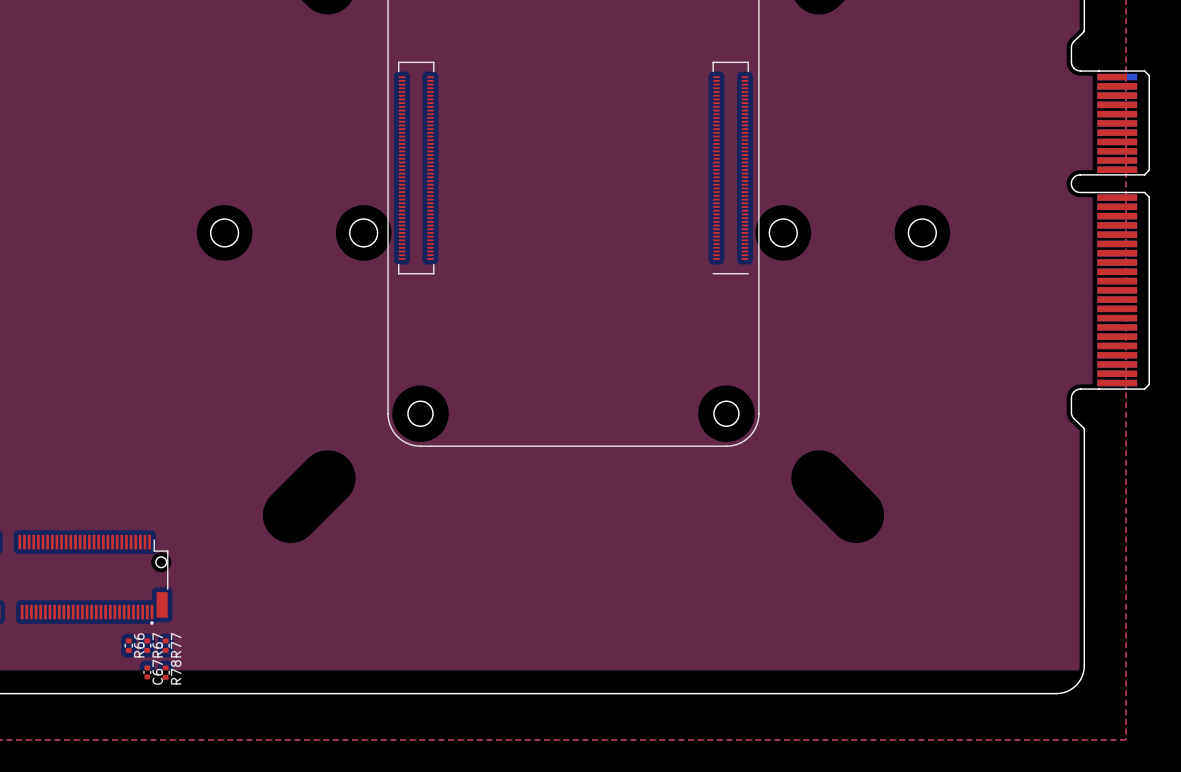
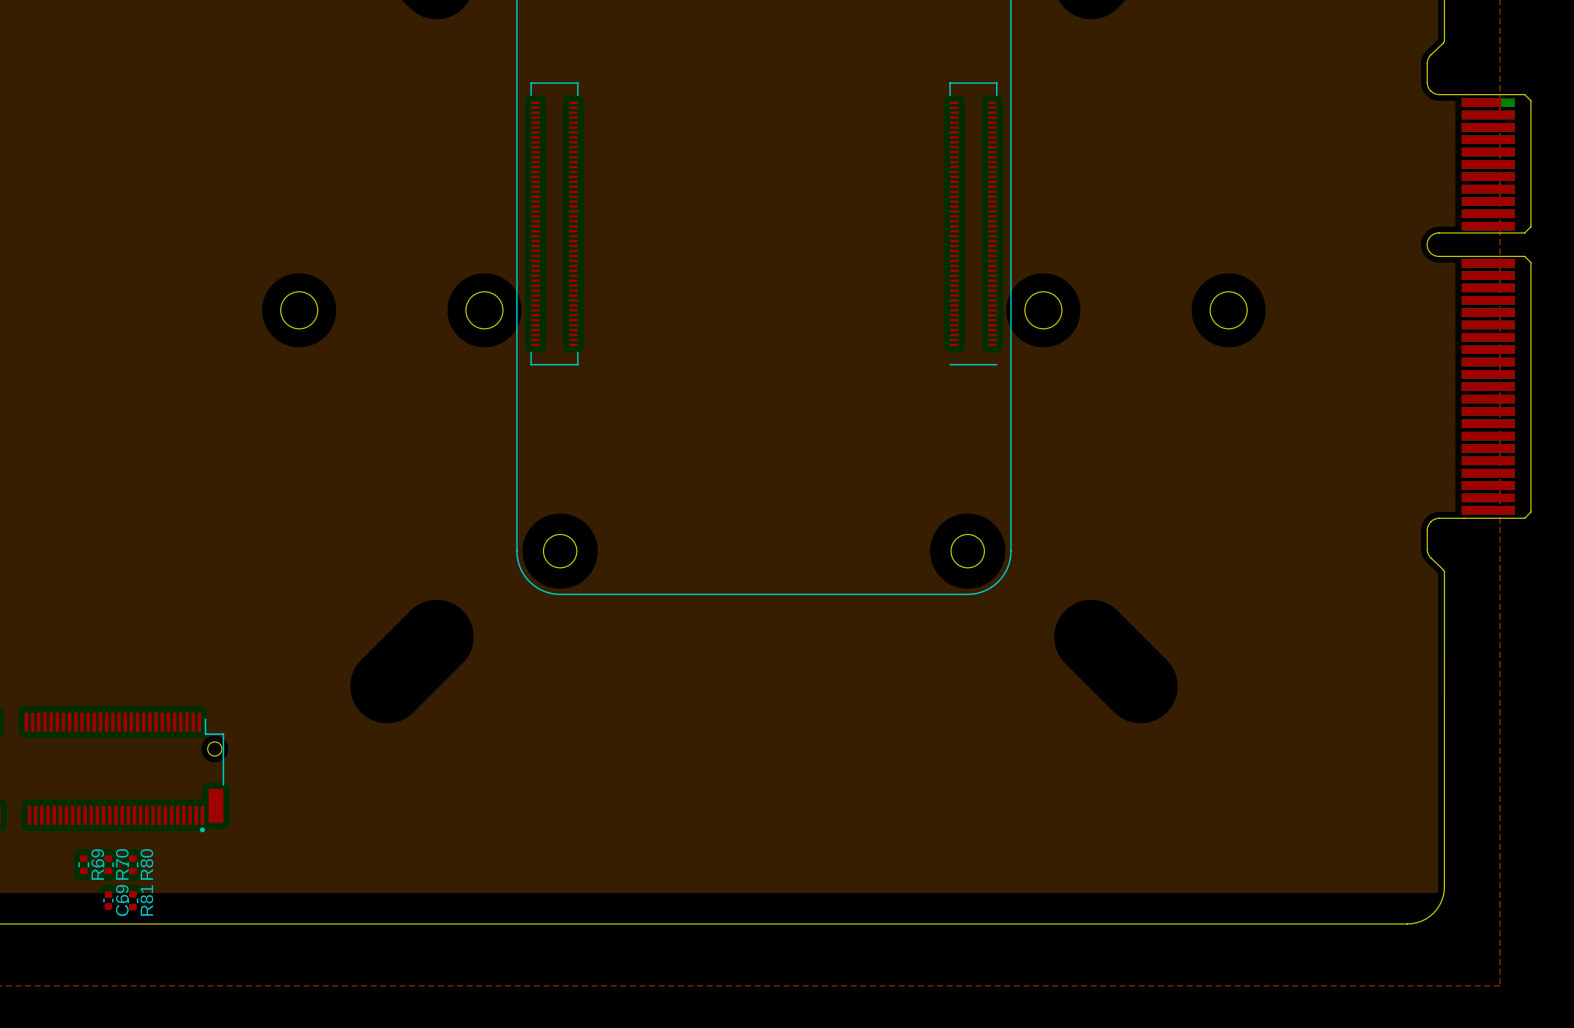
R66: (128, 645) -> none
R67: (147, 645) -> none
R77: (165, 645) -> none
R69: none -> (83, 864)
R70: none -> (108, 864)
R80: none -> (132, 864)
C67: (147, 672) -> none
R78: (165, 672) -> none
C69: none -> (108, 900)
R81: none -> (132, 900)

